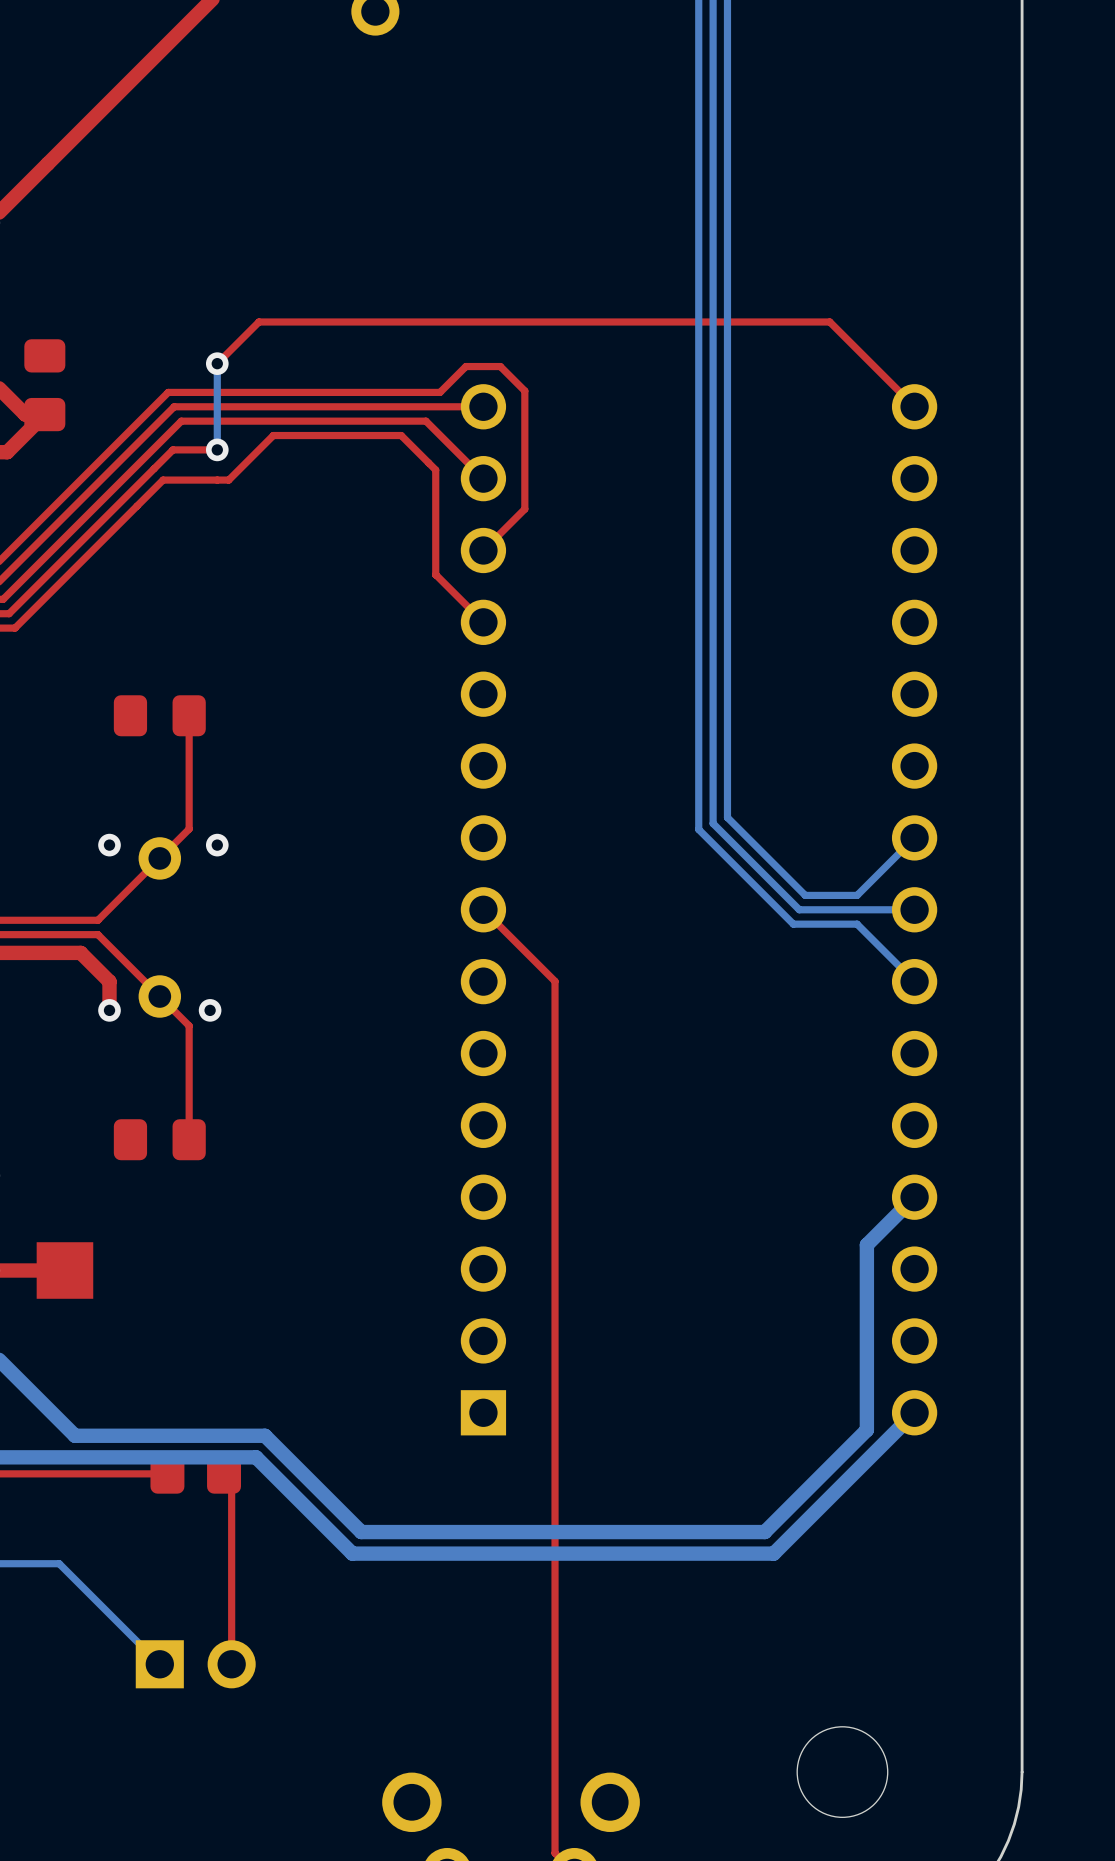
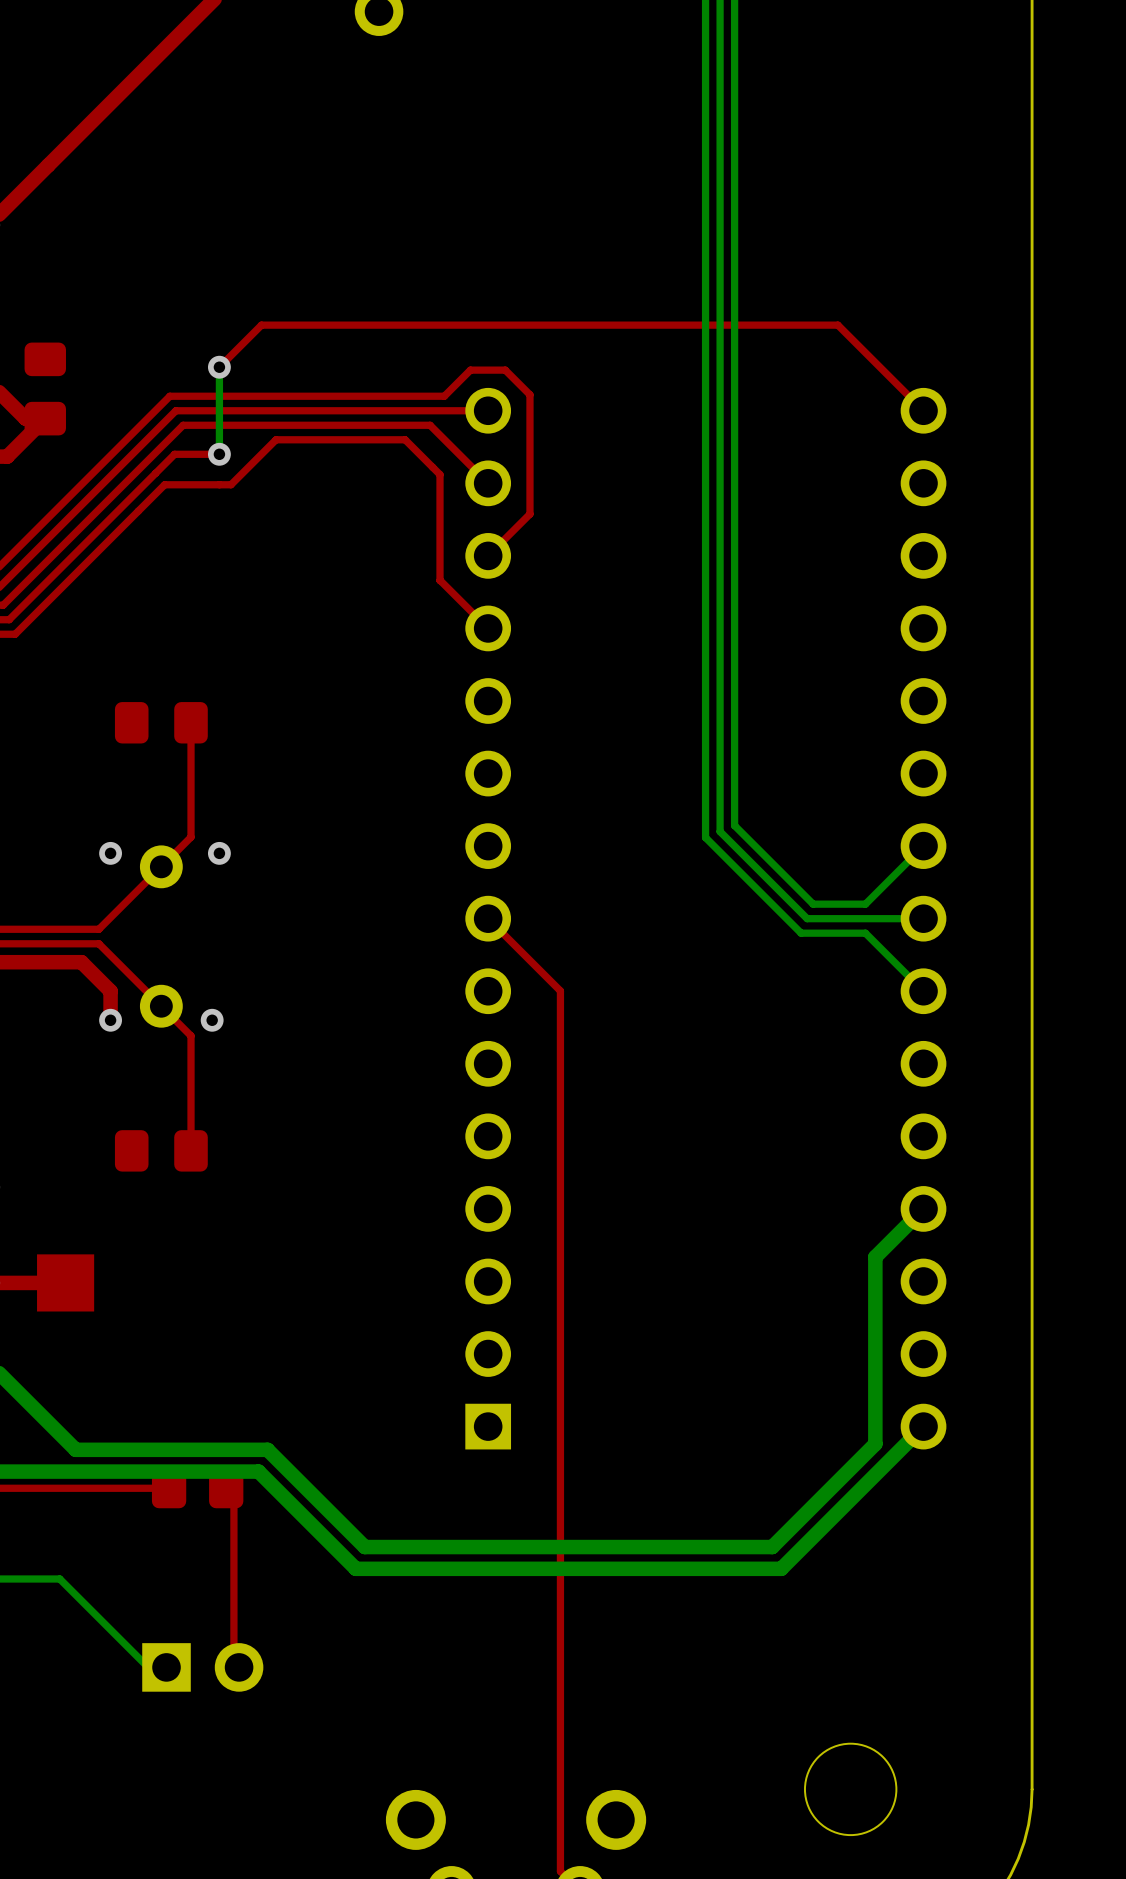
part position: (195, 1664) -> (202, 1667)

